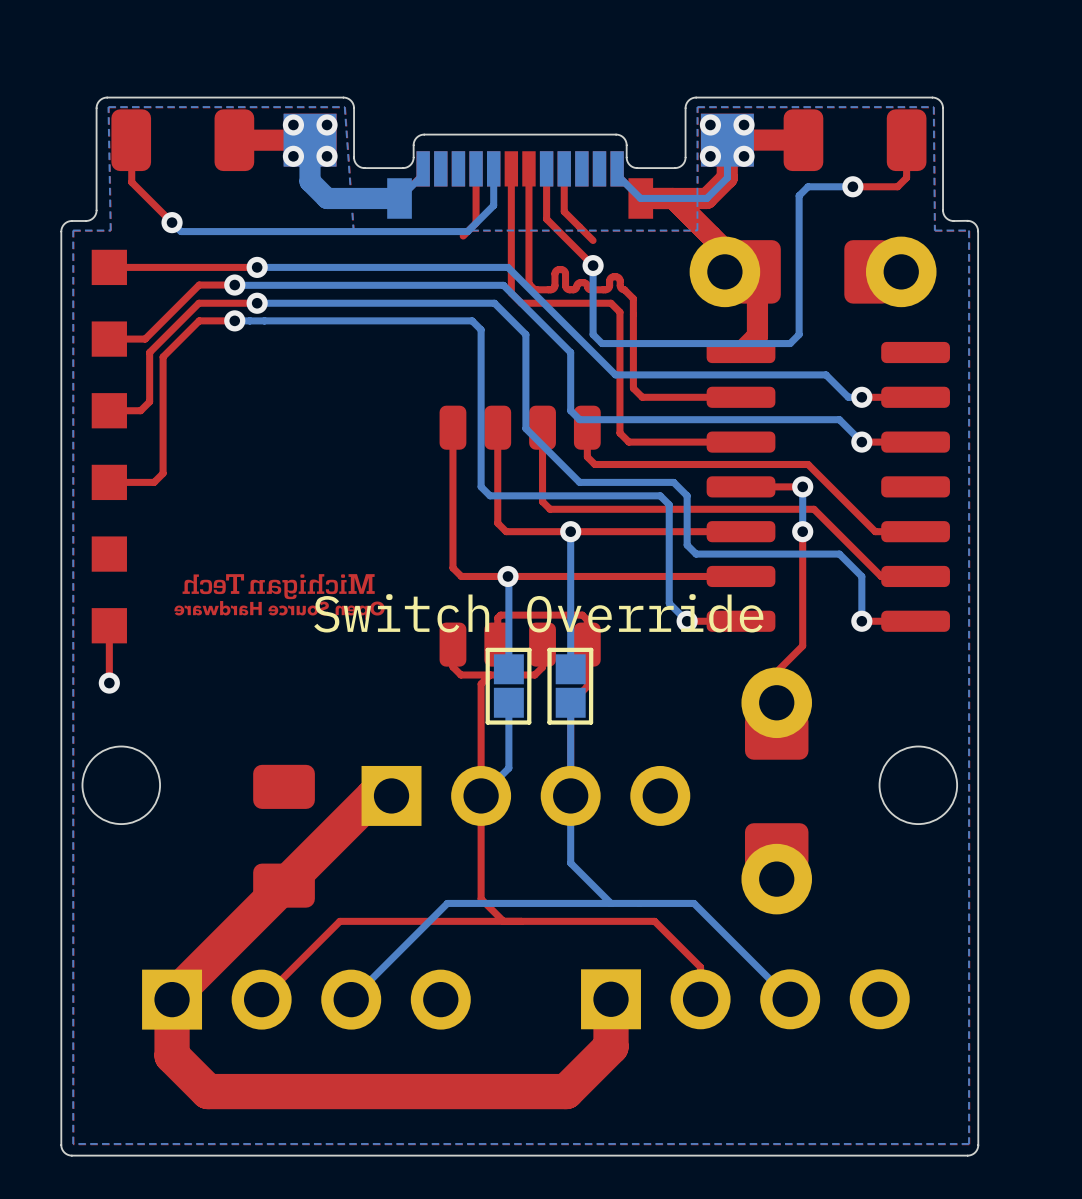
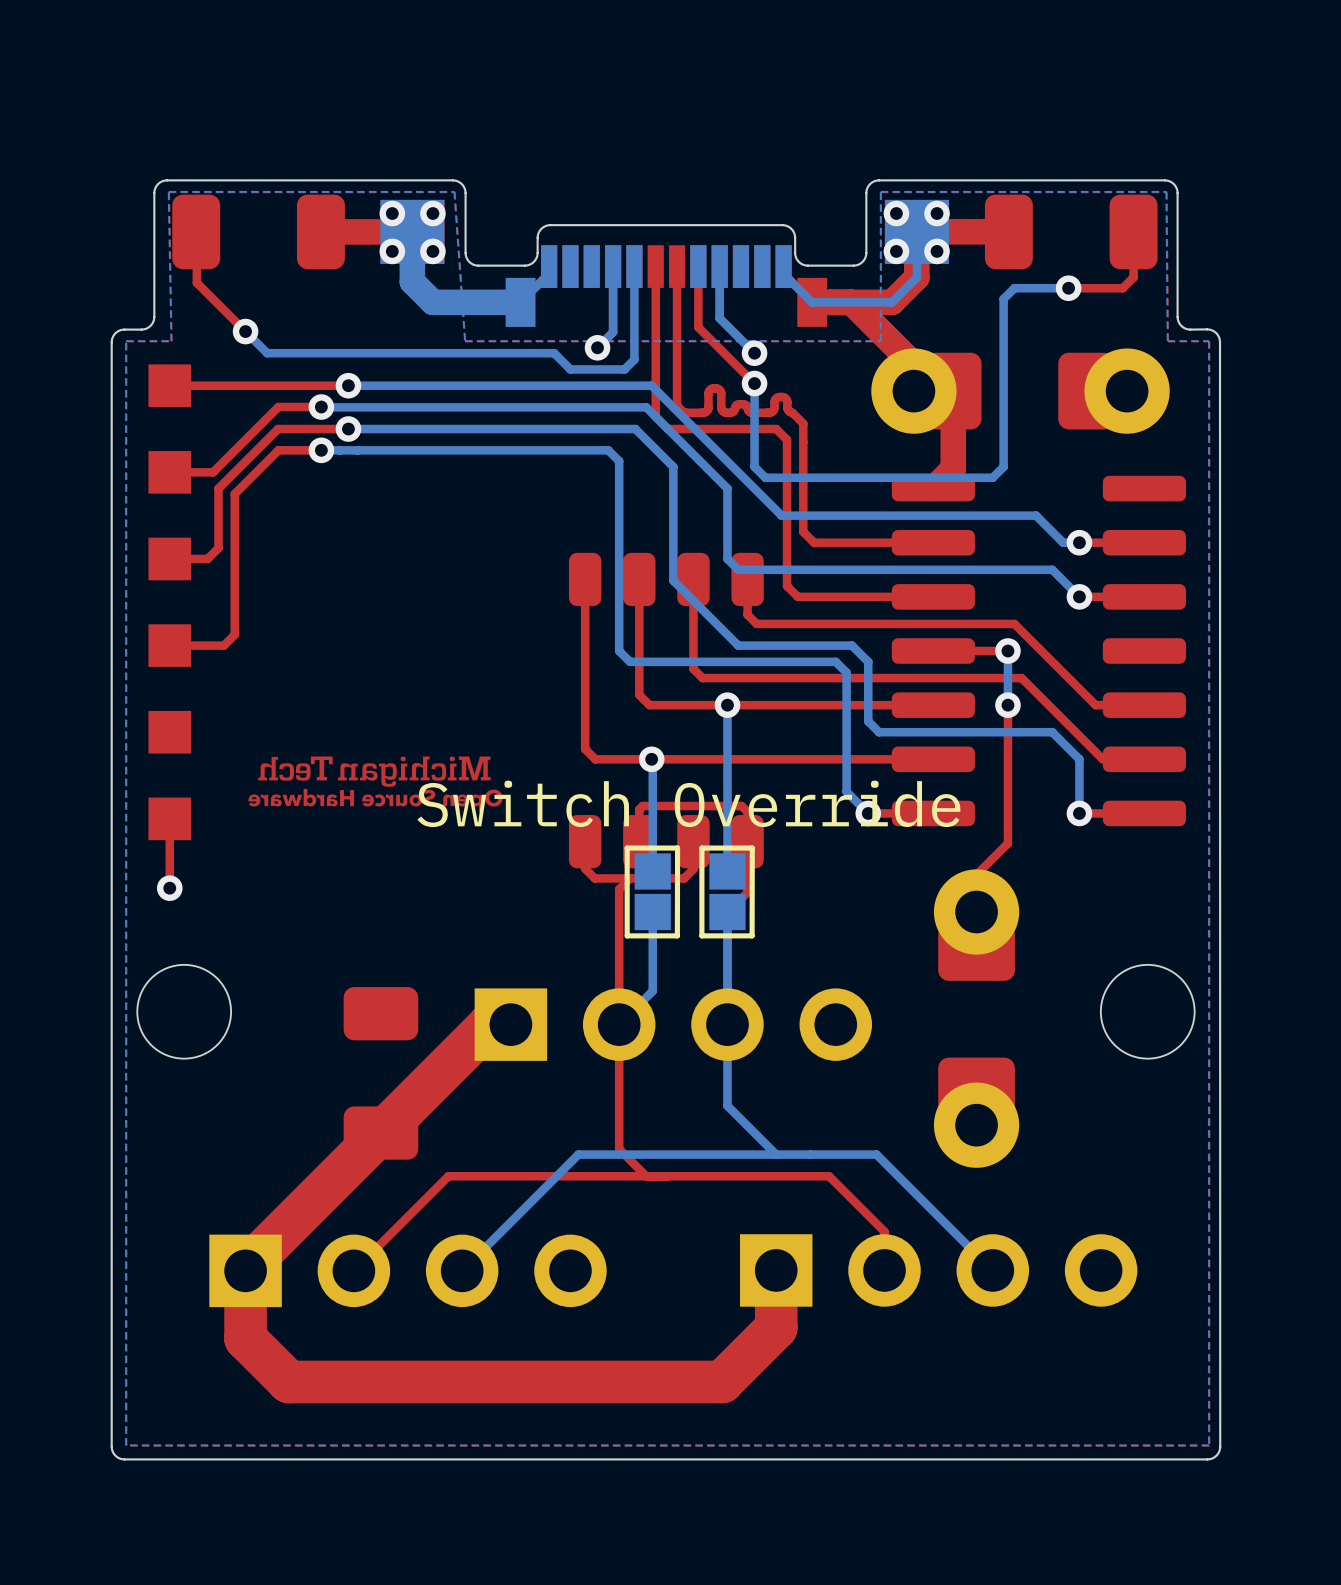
bottom track: none -> (719, 266) (719, 318) (754, 353)
bottom track: (493, 205) (476, 223) -> (613, 266) (613, 332)
bottom track: (467, 231) (181, 231) -> (634, 310) (634, 359) (624, 369) (570, 369) (554, 353) (267, 353) (256, 342)
via: none -> (597, 347)
via: none -> (754, 353)

